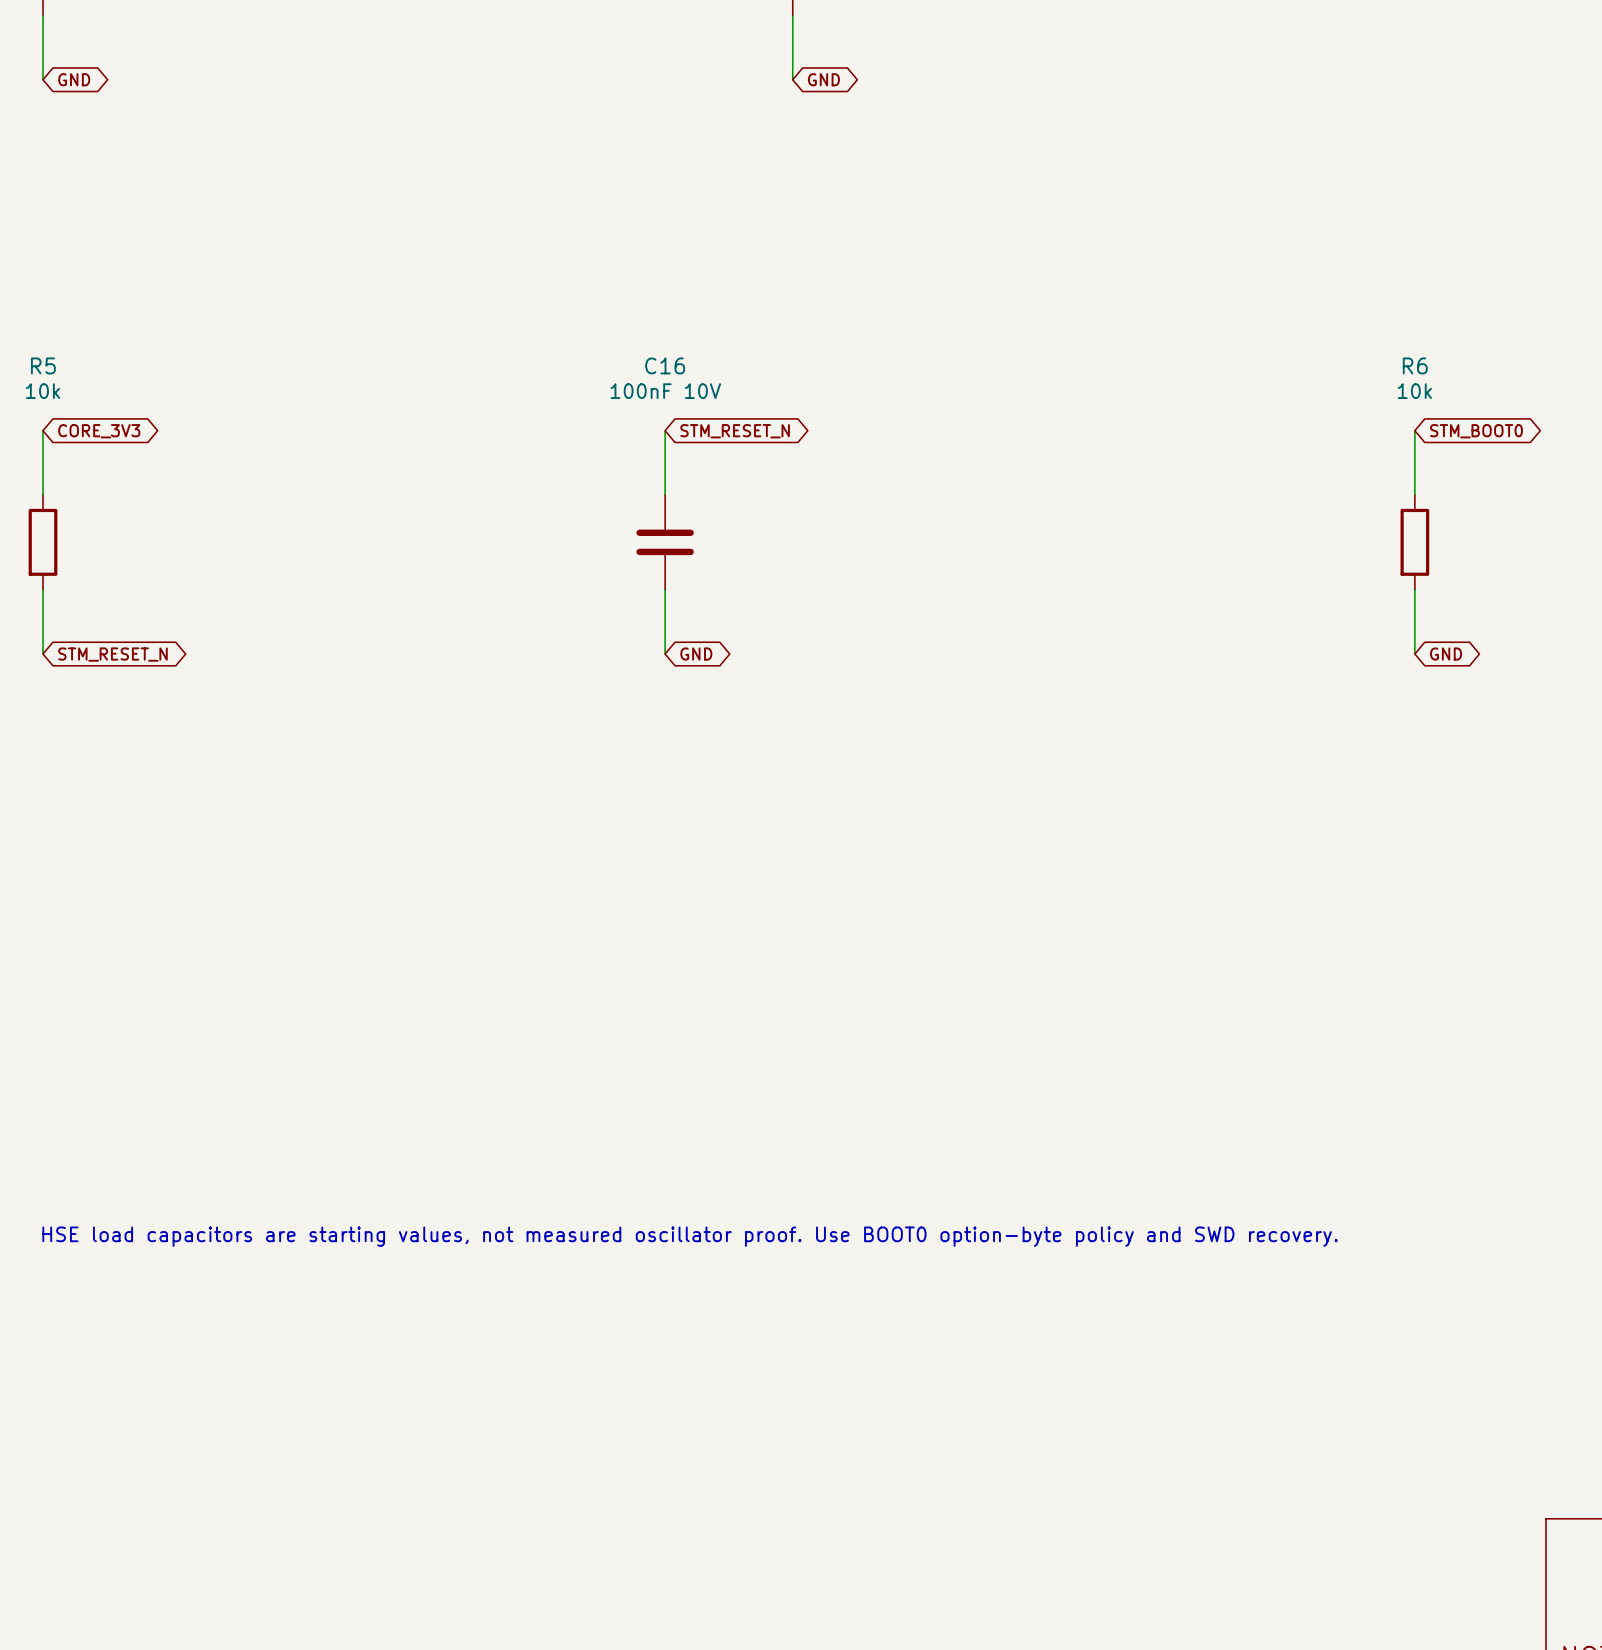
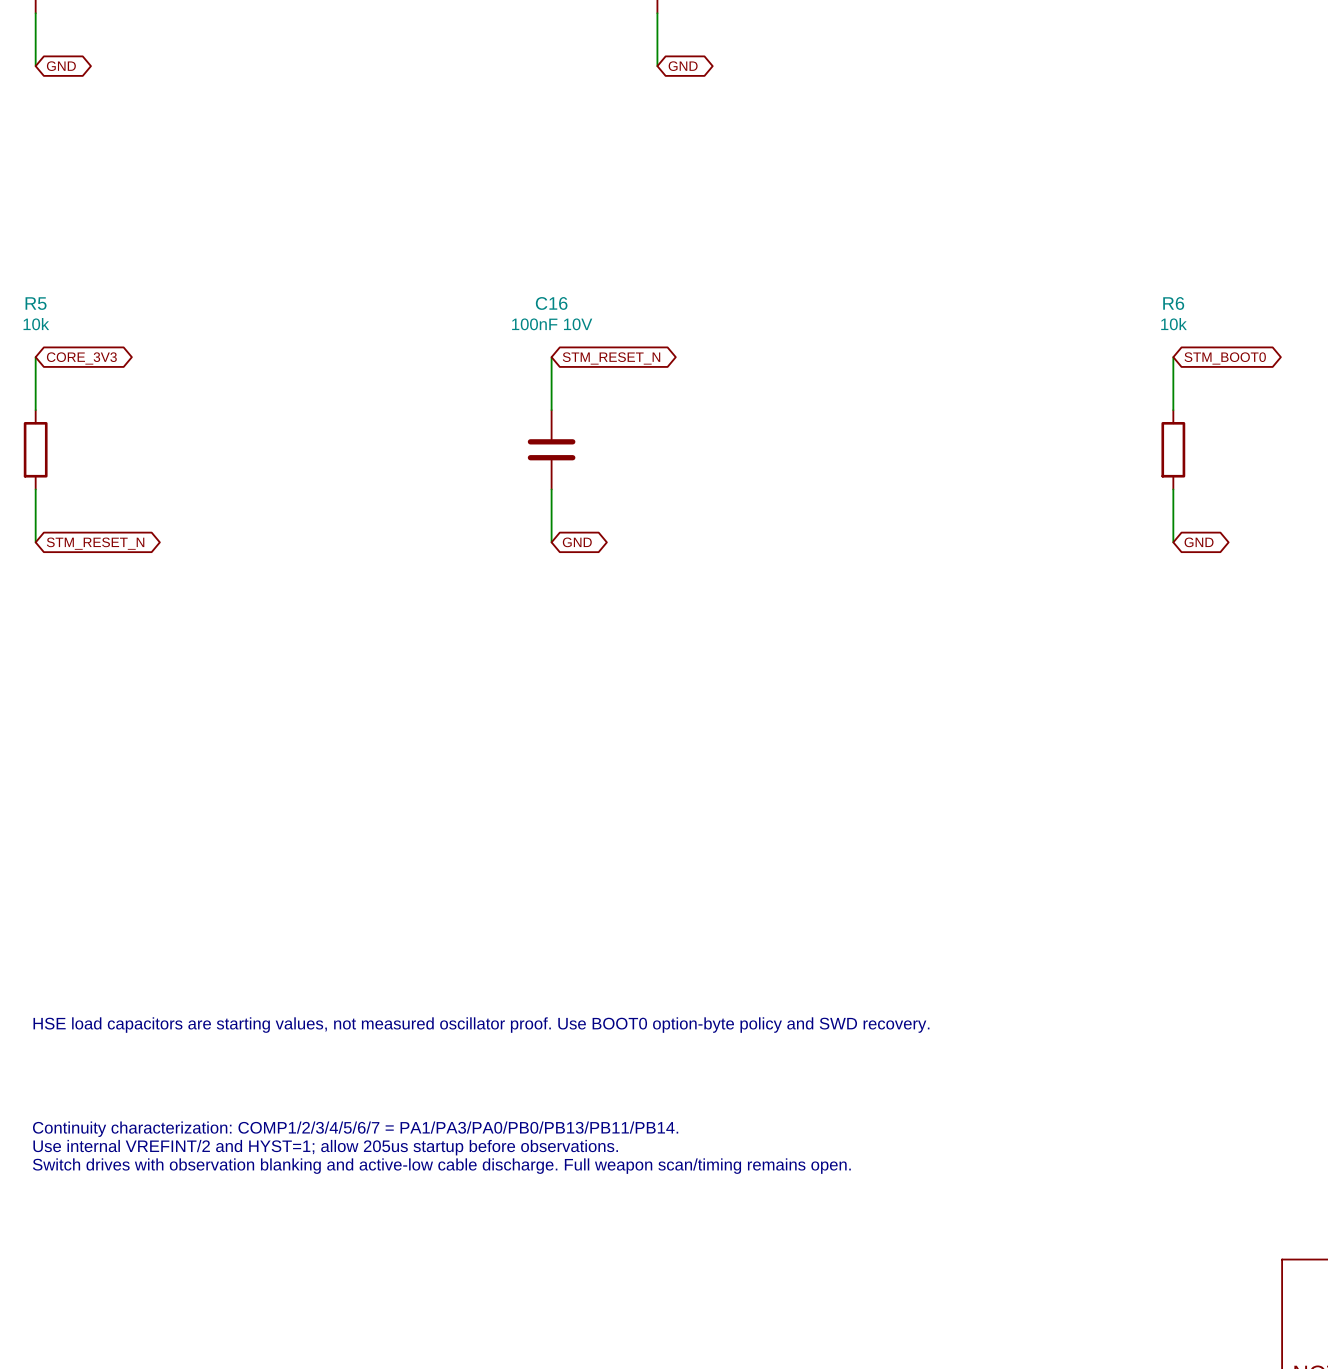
text: none -> Continuity characterization: COMP1/2/3/4/5/6/7 = PA1/PA3/PA0/PB0/PB13/PB11/PB14. (355, 1129)
text: none -> Use internal VREFINT/2 and HYST=1; allow 205us startup before observations. (325, 1147)
text: none -> Switch drives with observation blanking and active-low cable discharge. Full weapon scan/timing remains open. (441, 1166)

